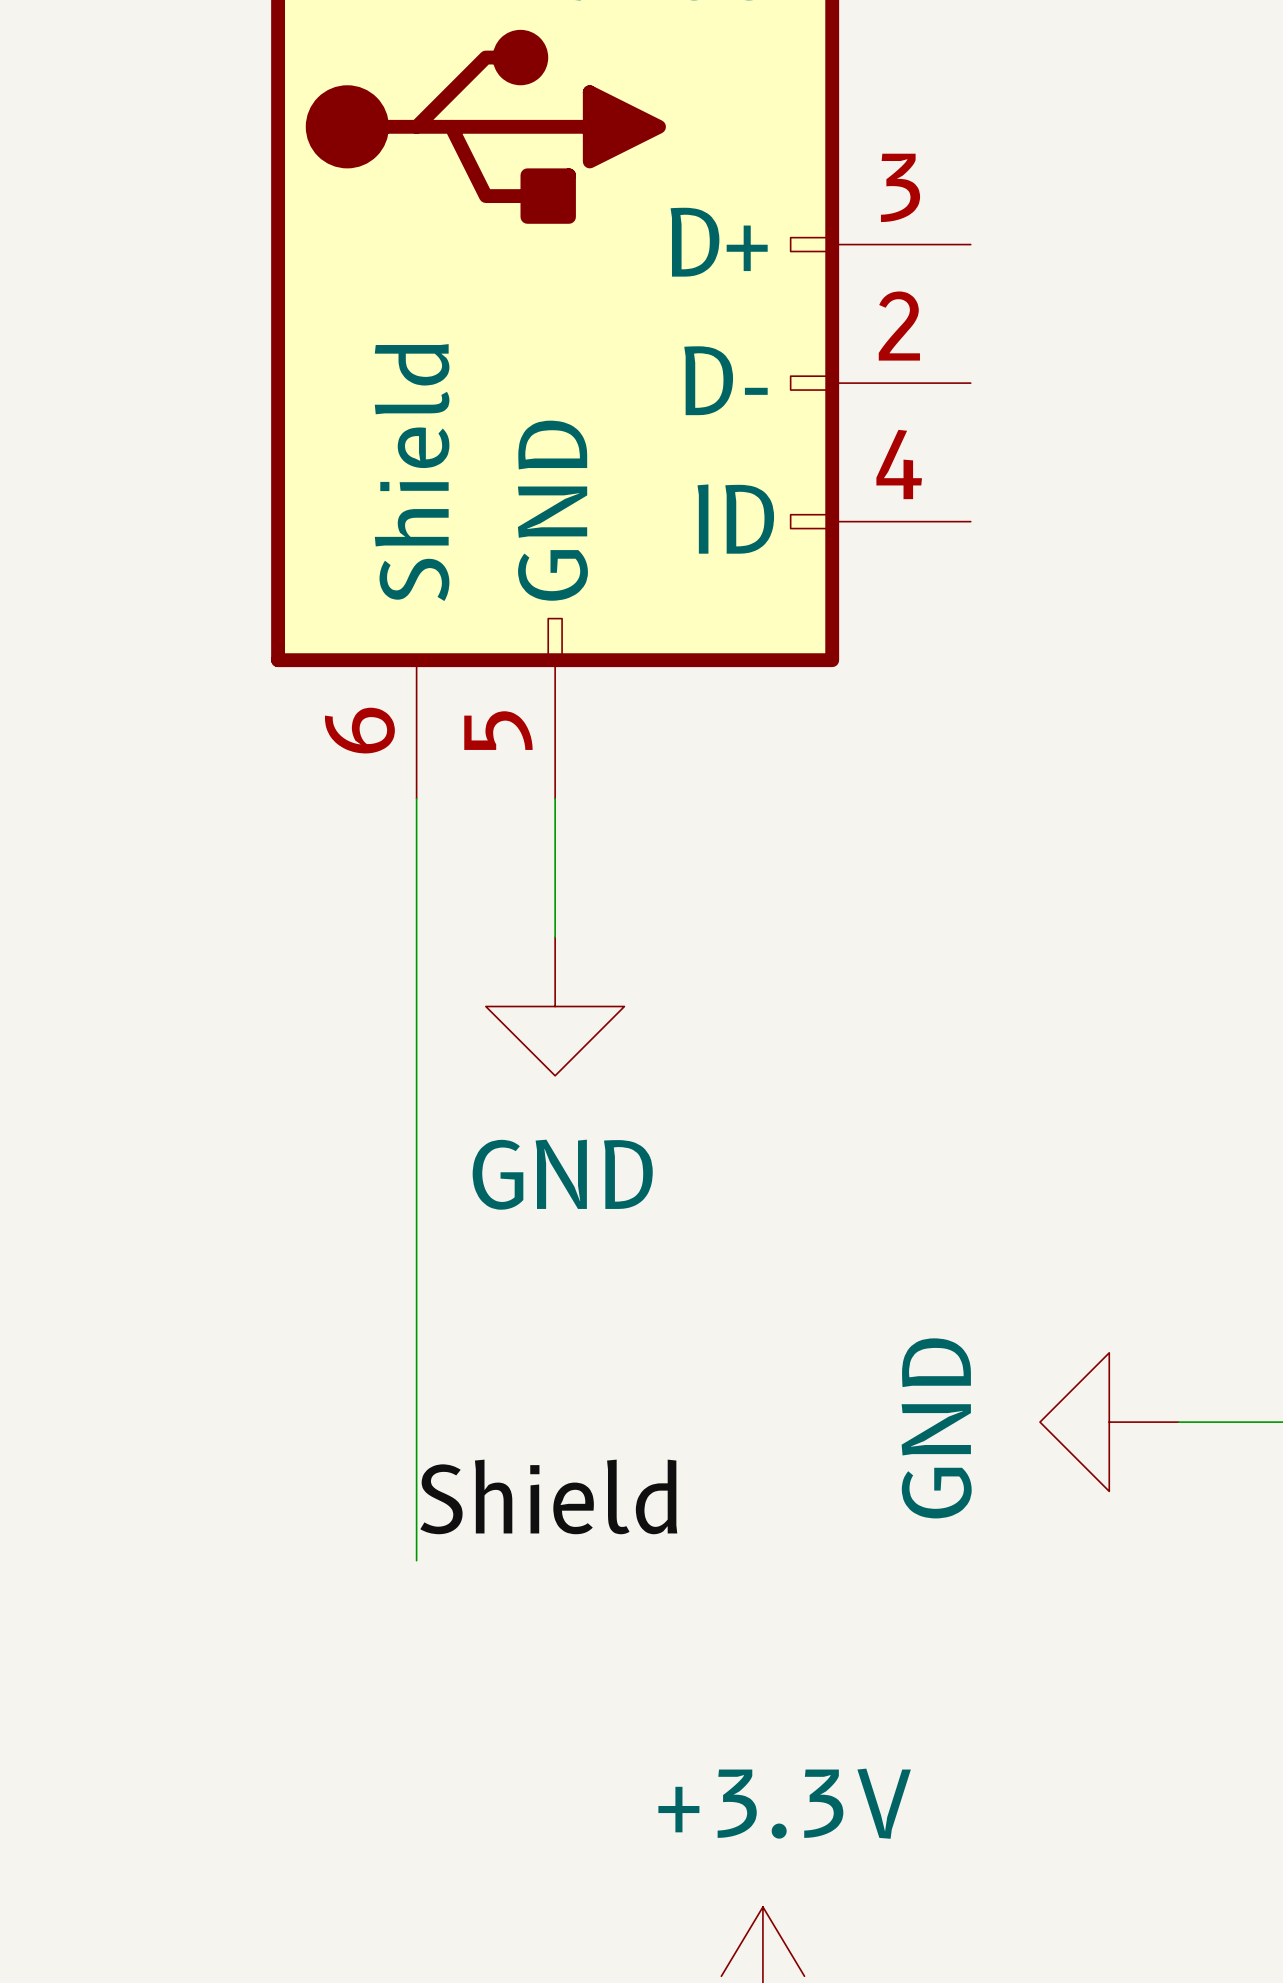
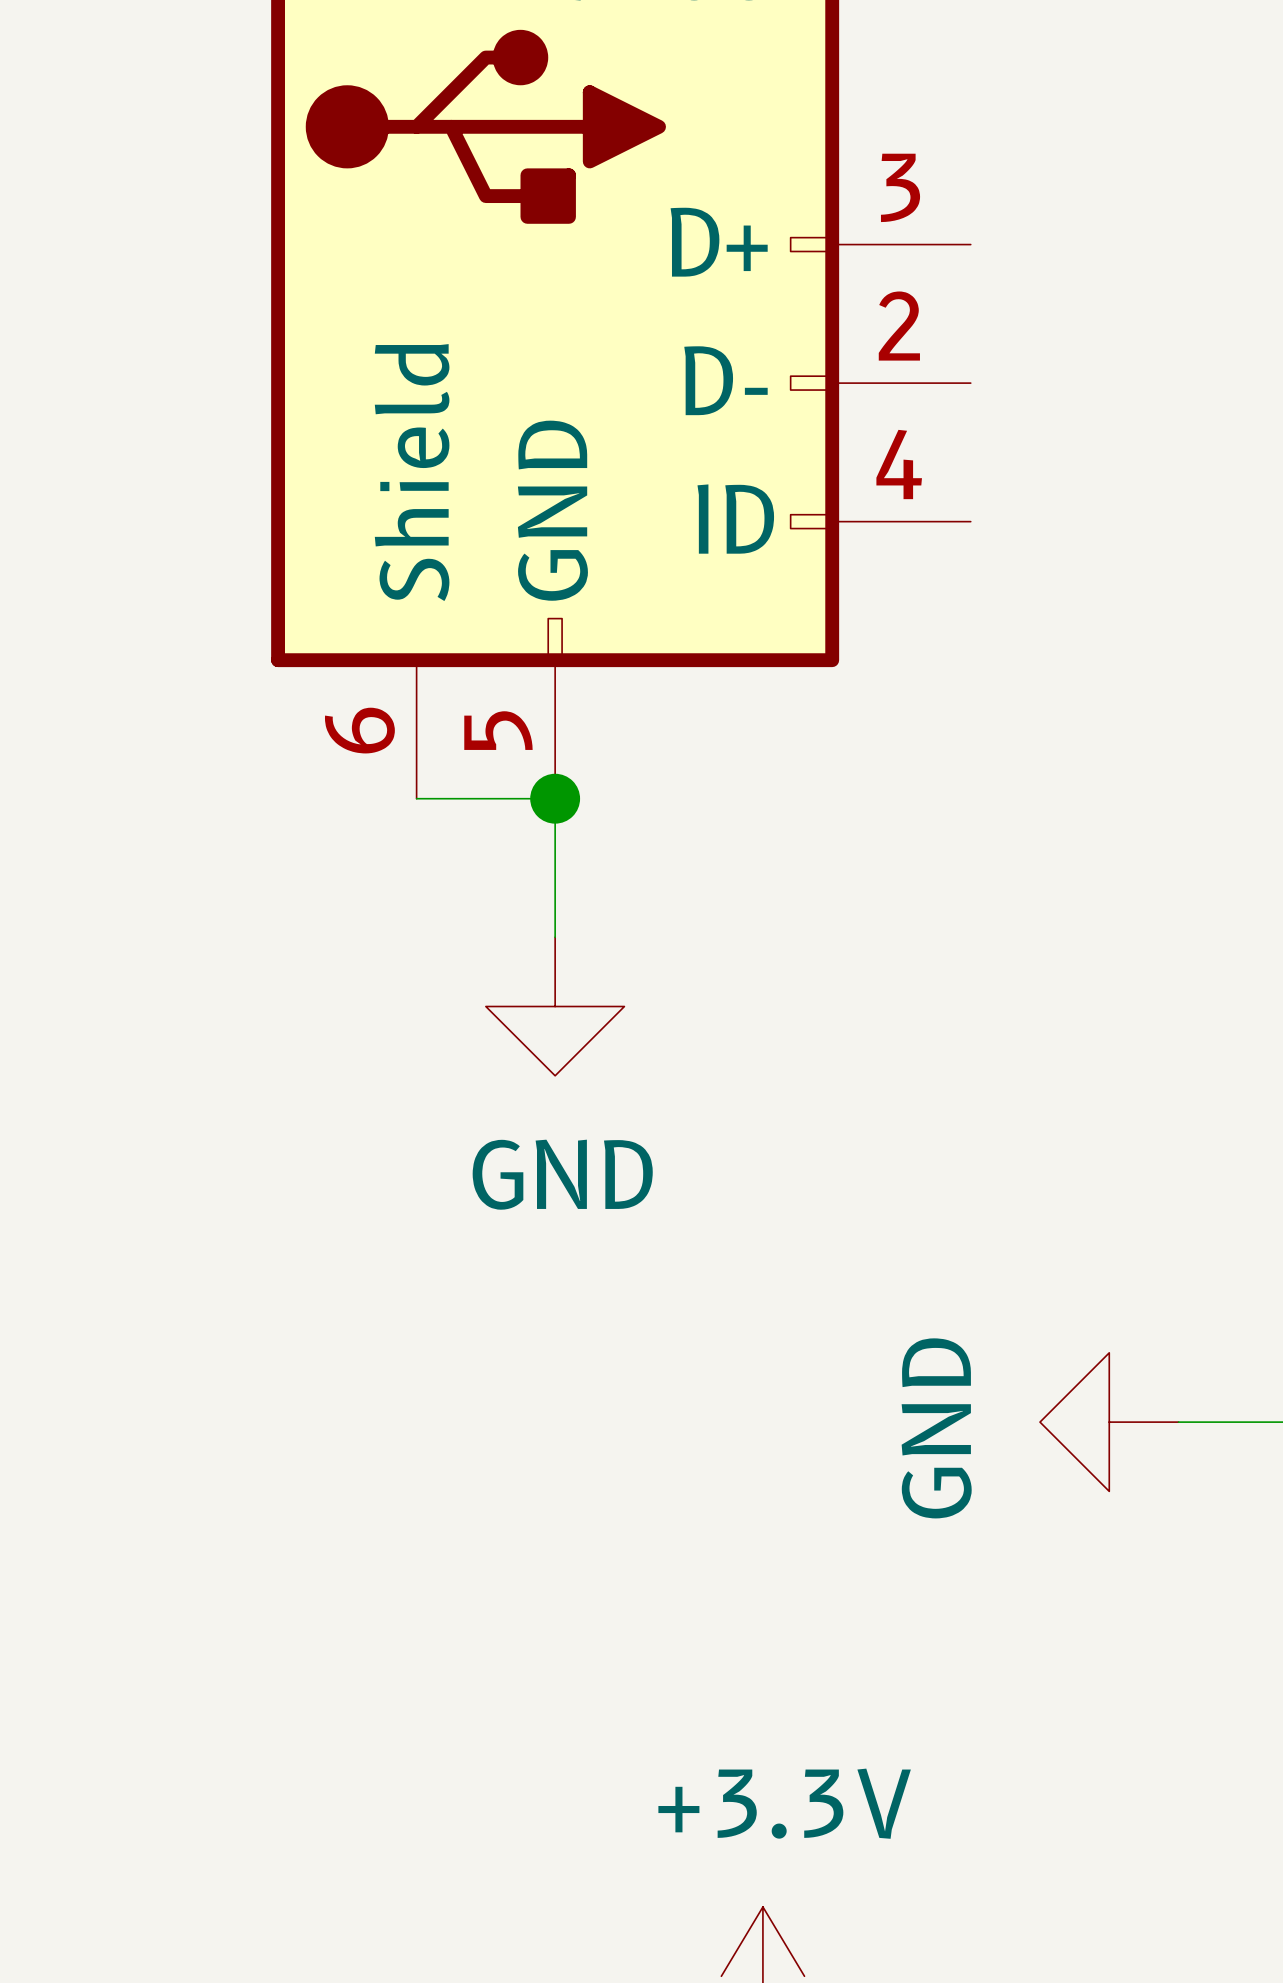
wire: (416, 798) (416, 1560) -> (416, 798) (555, 798)
junction: none -> (555, 798)
label: Shield (548, 1496) -> none

